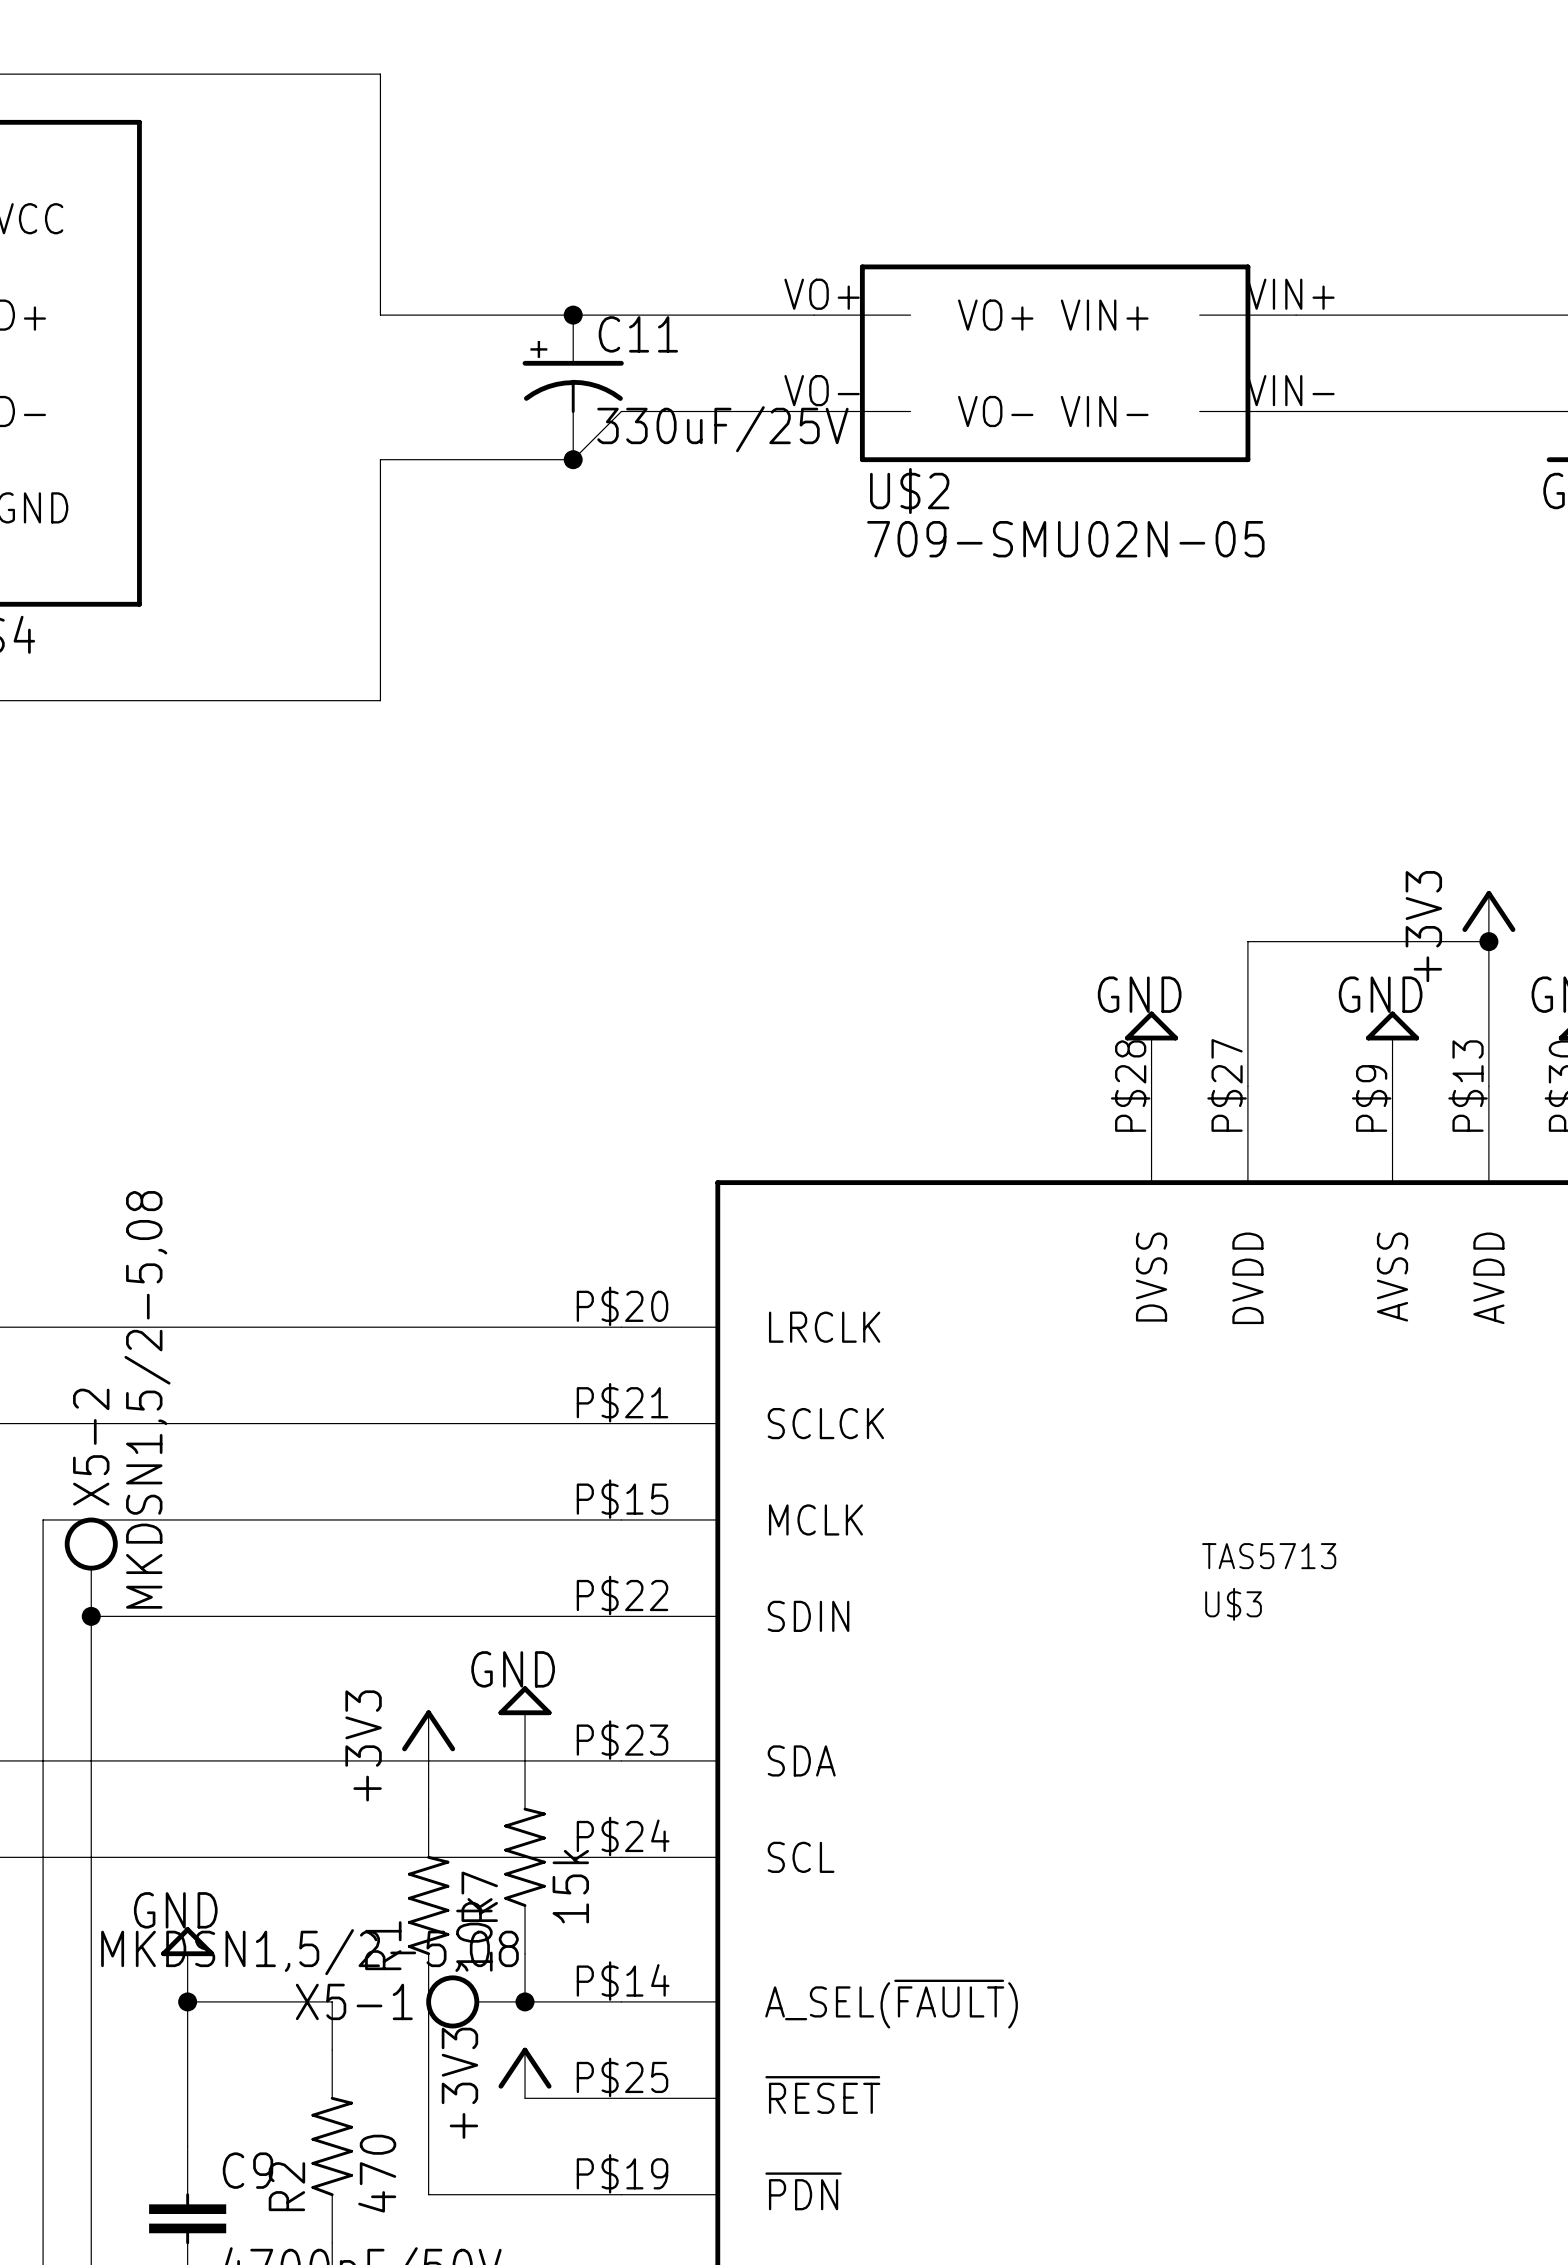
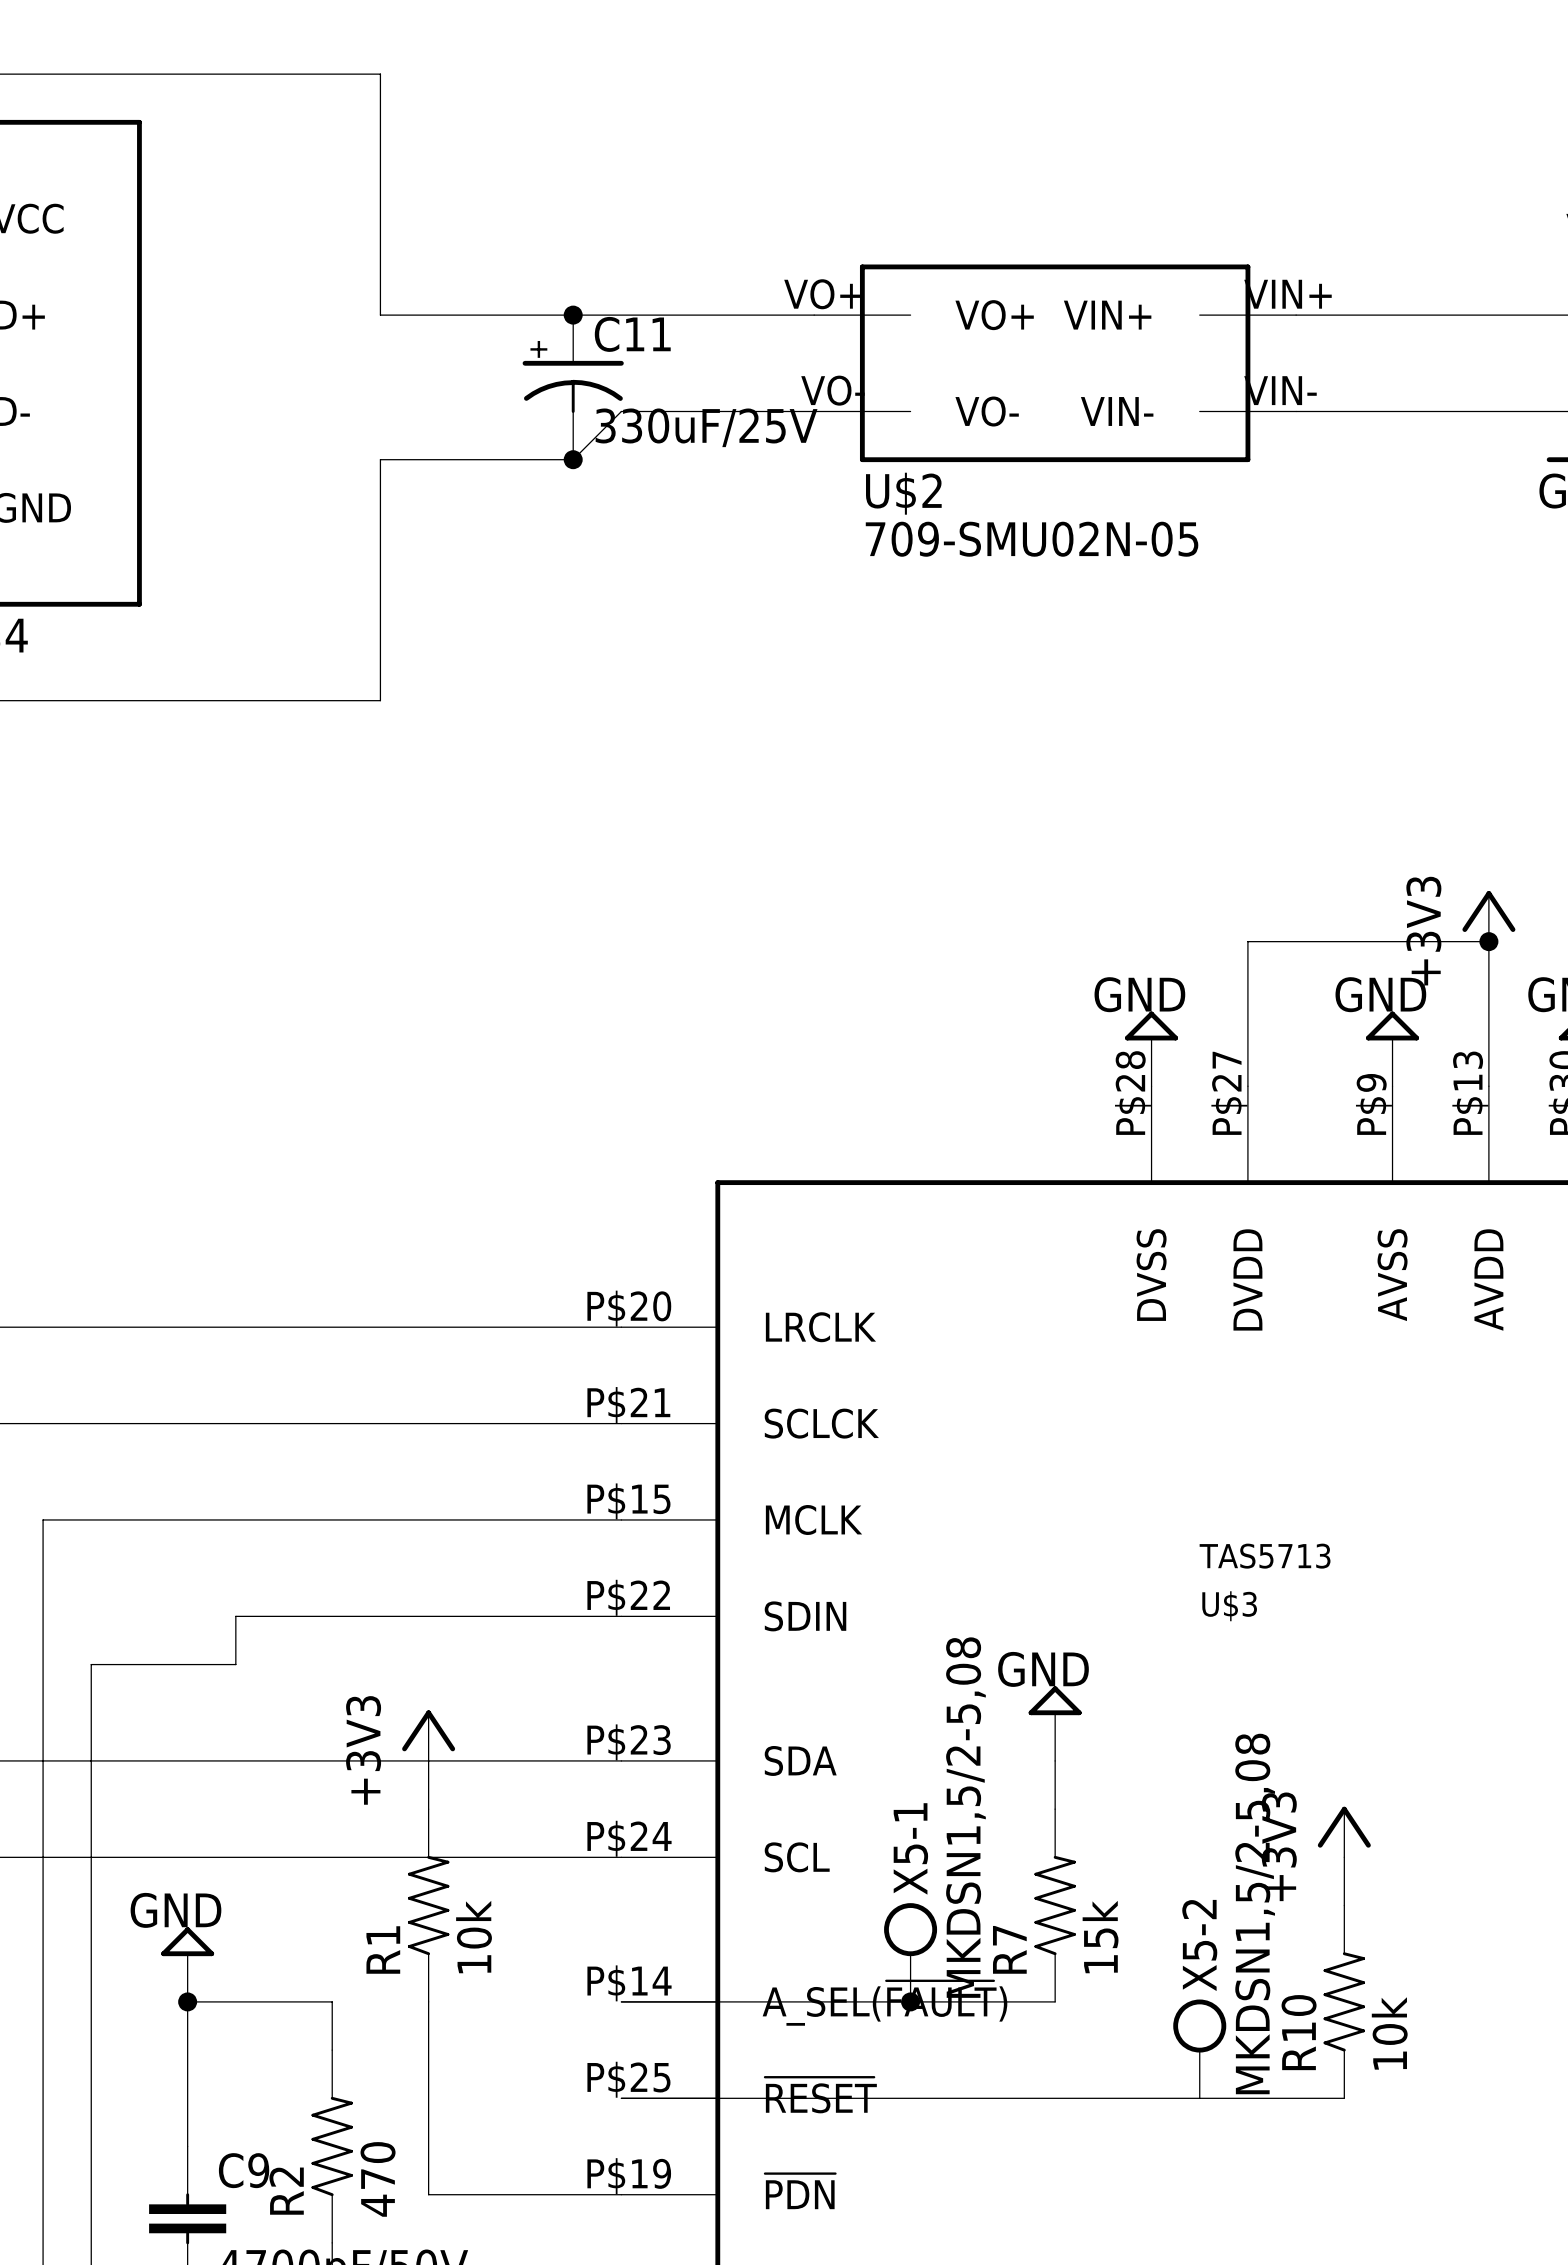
X5-2 position: (91, 1566) -> (1199, 2048)
junction: (91, 1616) -> none
wire: (235, 1616) (91, 1616) (91, 1664) -> (235, 1616) (235, 1664) (91, 1664)
power symbol: GND (525, 1723) -> none
power symbol: none -> GND (1055, 1723)
wire: none -> (1055, 1760) (1055, 1809)
power symbol: none -> +3V3 (1344, 1832)
R7 position: (525, 1857) -> (1055, 1905)
wire: none -> (1344, 1857) (1344, 1905)
wire: (525, 1953) (525, 2001) (621, 2001) -> (1055, 2001) (621, 2001)
X5-1 rotation: 0° (452, 2001) -> 90° clockwise (910, 1929)
X5-1 position: (475, 2001) -> (910, 1952)
junction: (525, 2001) -> none
junction: none -> (910, 2001)
R10: none -> 10k (1344, 2001)
power symbol: +3V3 (525, 2073) -> none
wire: (525, 2098) (621, 2098) -> (1344, 2098) (621, 2098)

